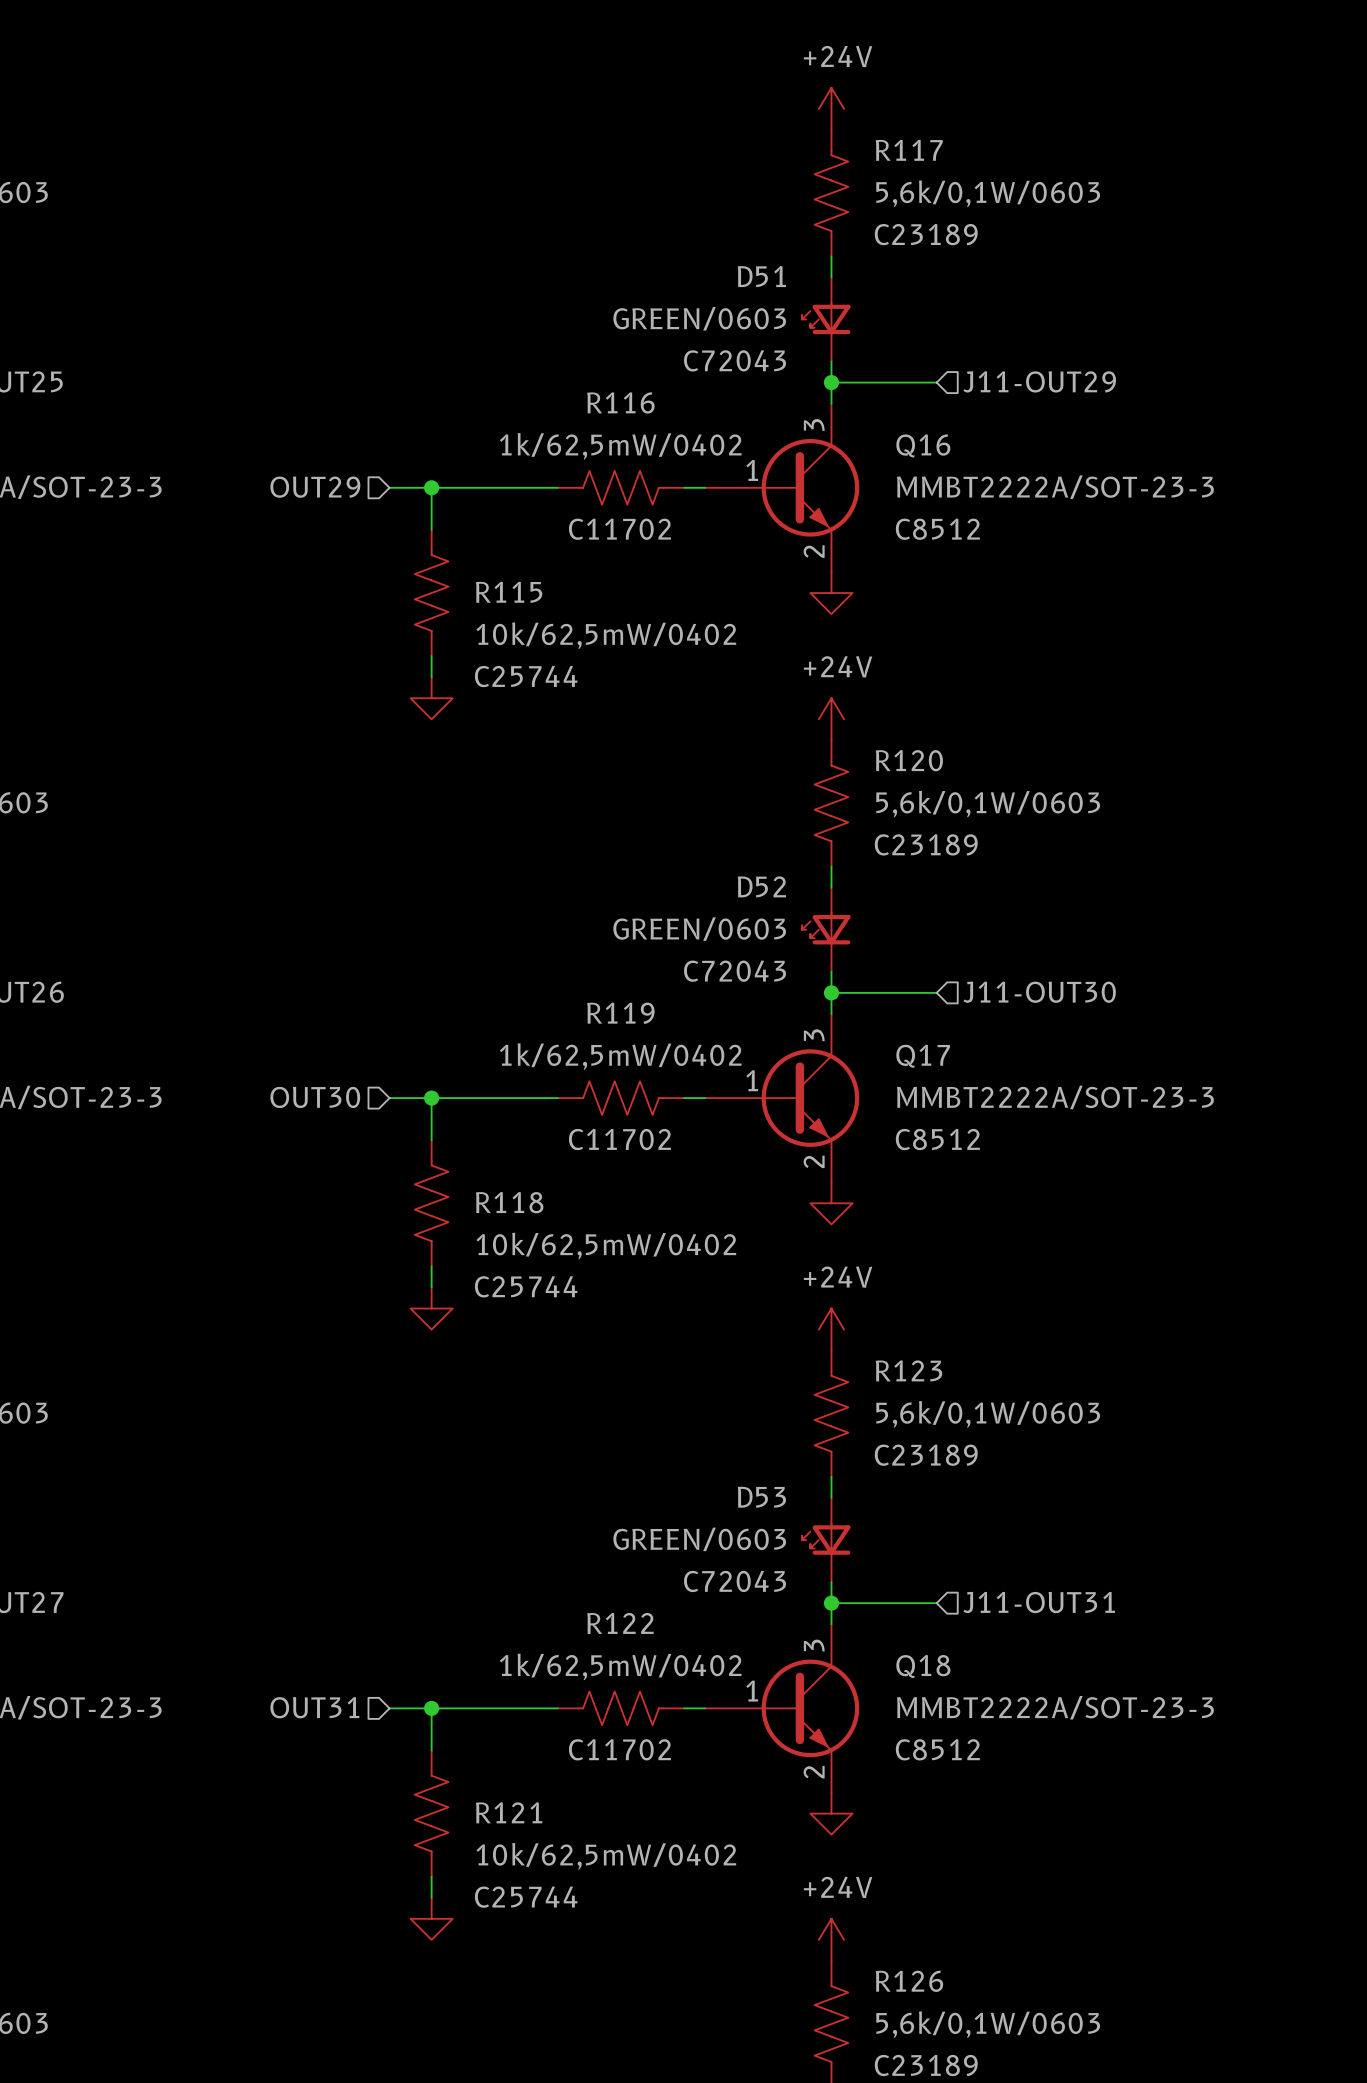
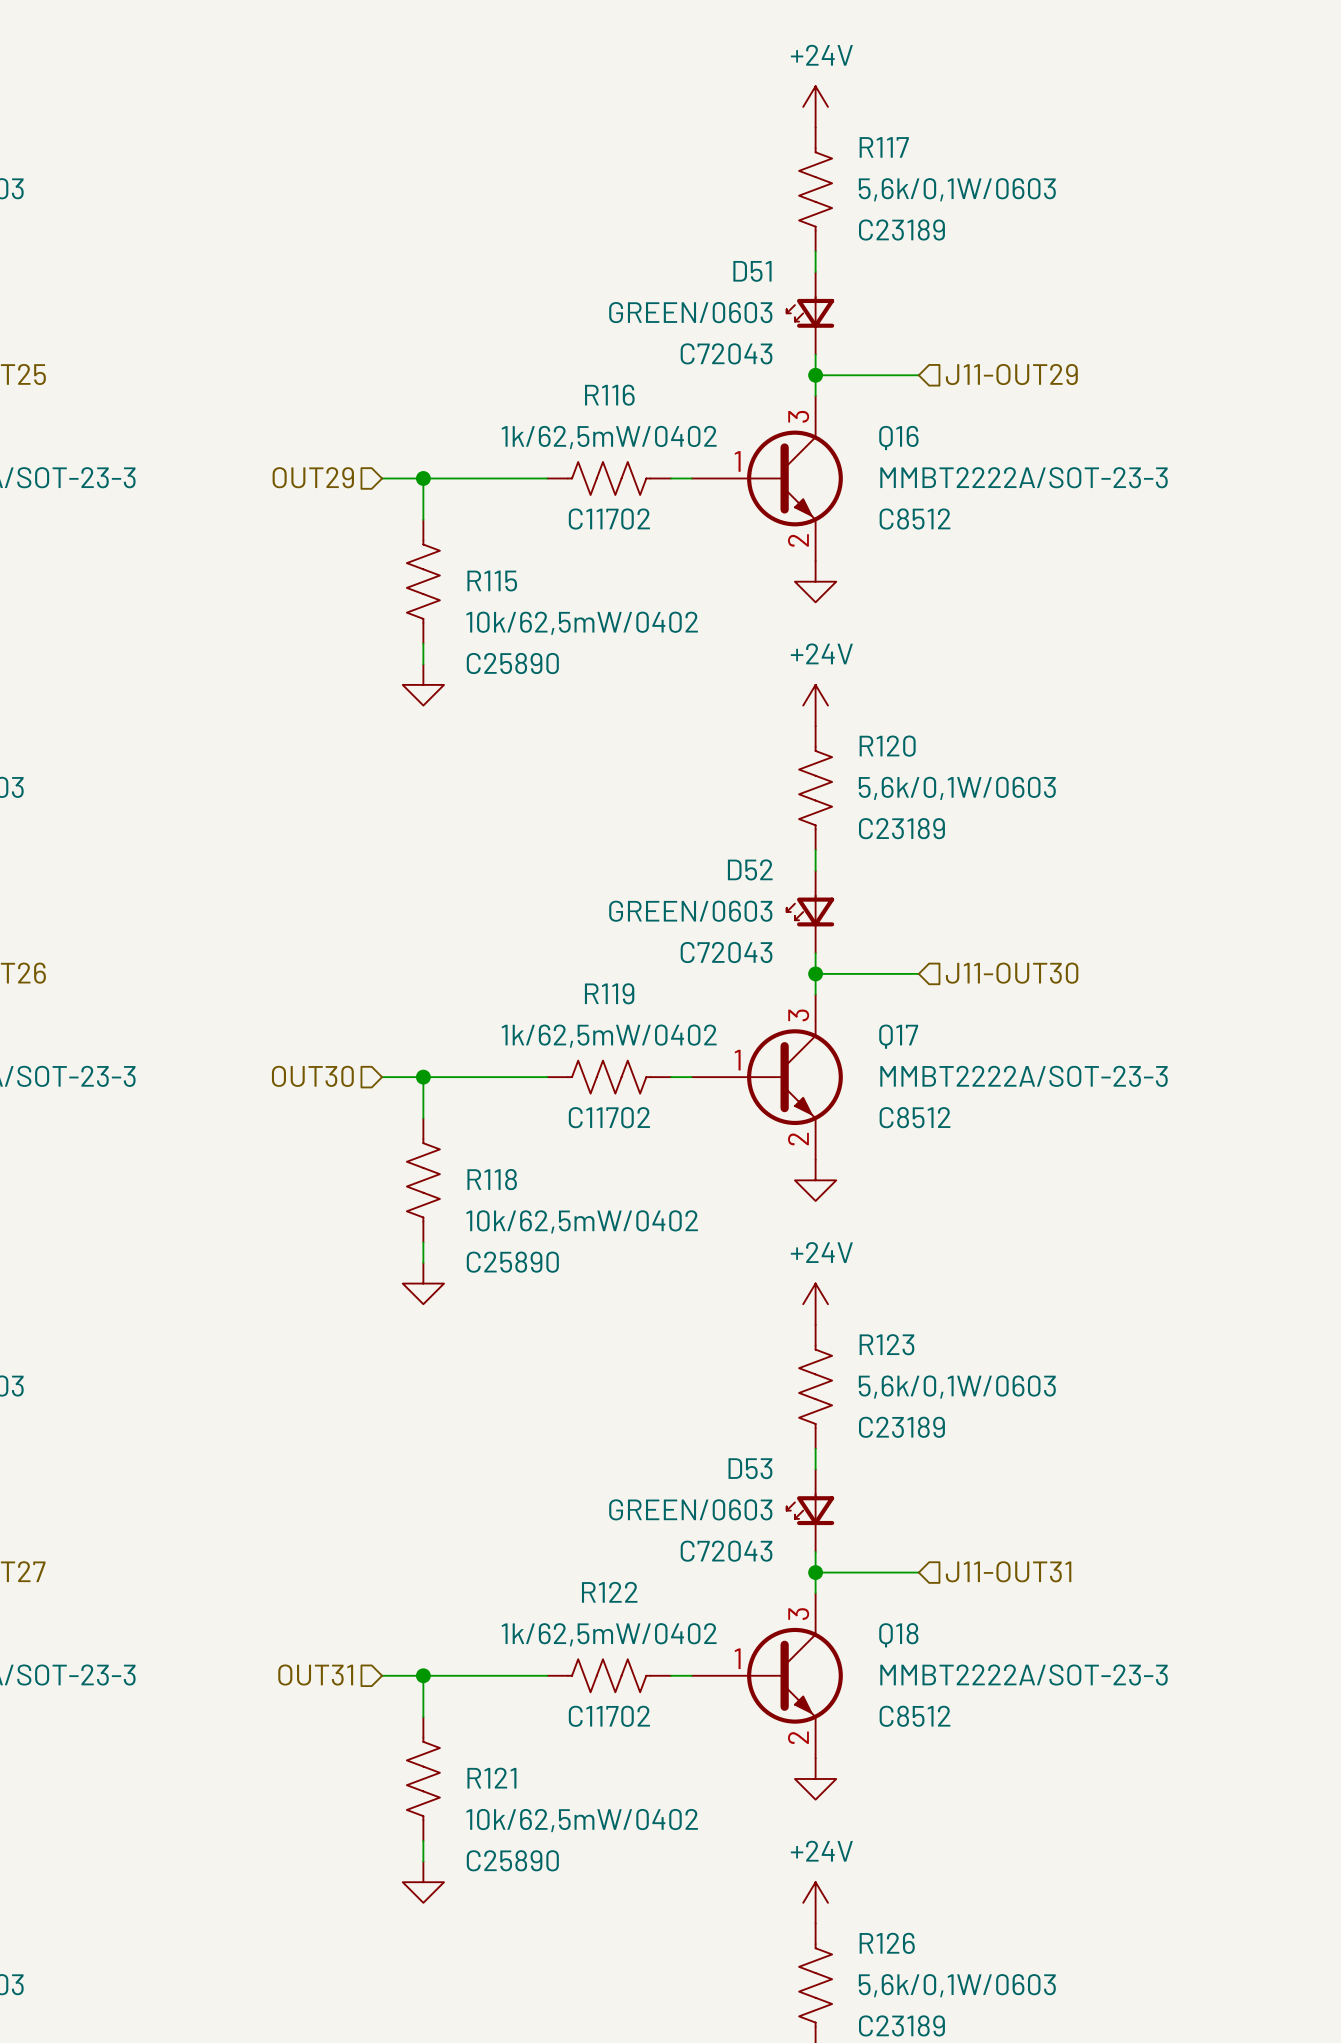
R115 text: C25744 (526, 676) -> C25890 (512, 663)
R118 text: C25744 (526, 1286) -> C25890 (512, 1262)
R121 text: C25744 (526, 1897) -> C25890 (512, 1860)

